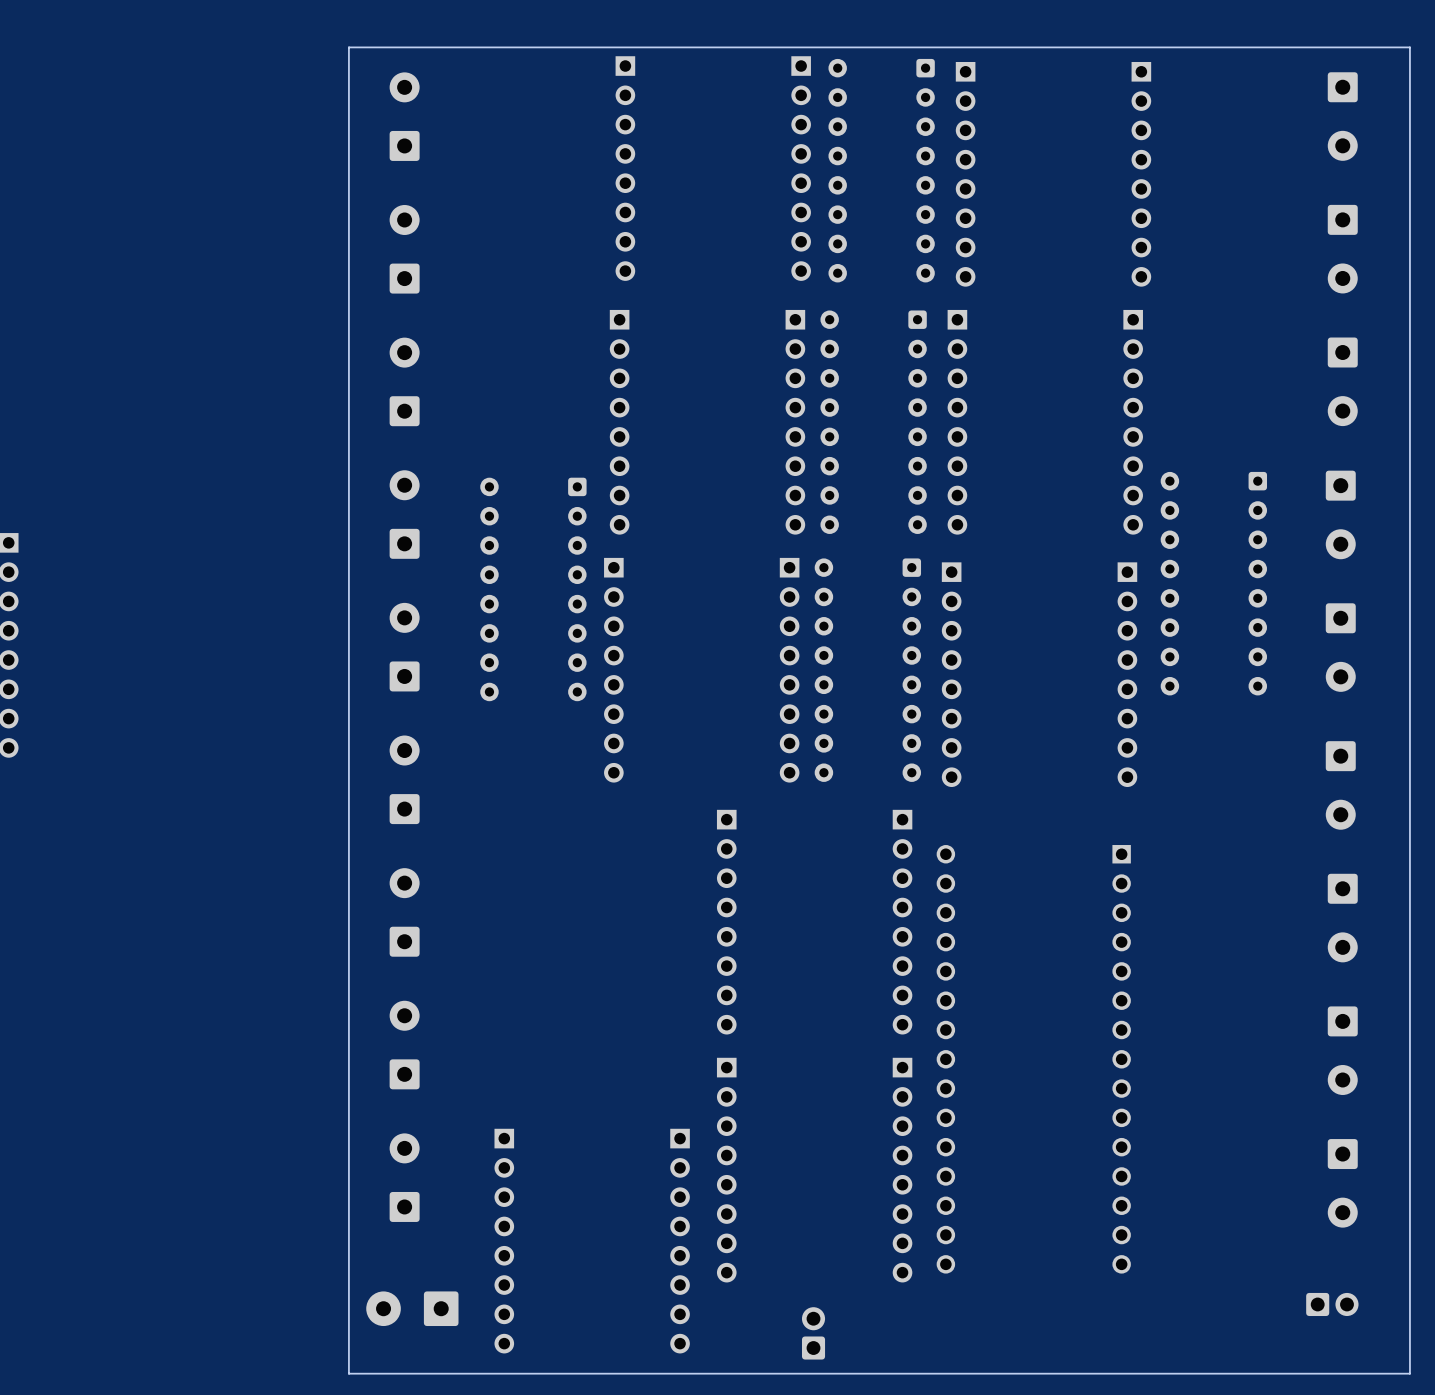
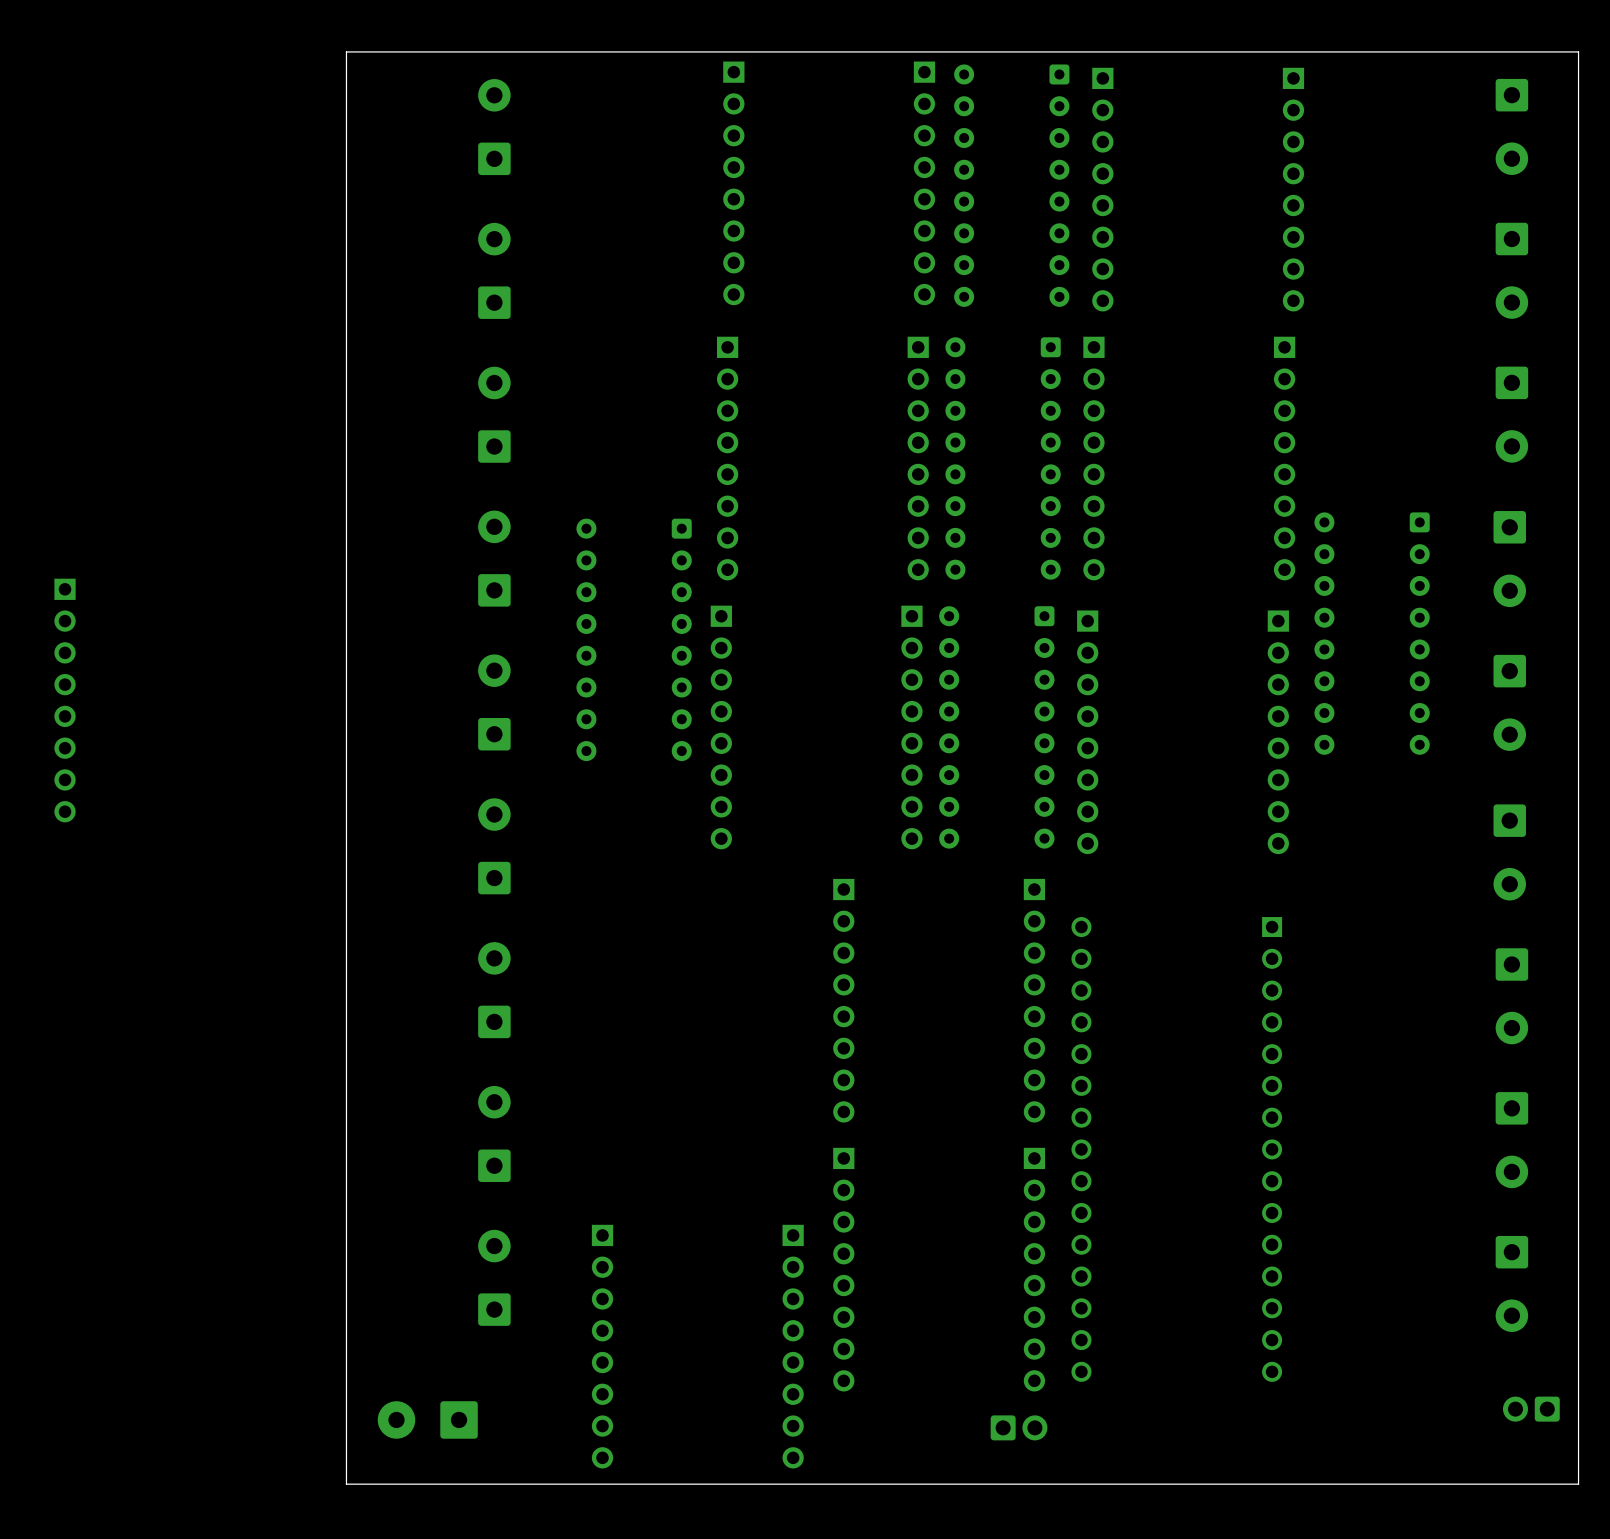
board edge: (1404, 47) (1409, 47) (1409, 1373) (348, 1373) (348, 47) -> (1578, 51) (1578, 1484) (346, 1484) (346, 51) (434, 51)
part rotation: 0° (1332, 1304) -> 180° (1531, 1409)
part position: (412, 1308) -> (427, 1419)
part rotation: 0° (813, 1333) -> 90° clockwise (1019, 1427)
part position: (813, 1333) -> (1019, 1427)

